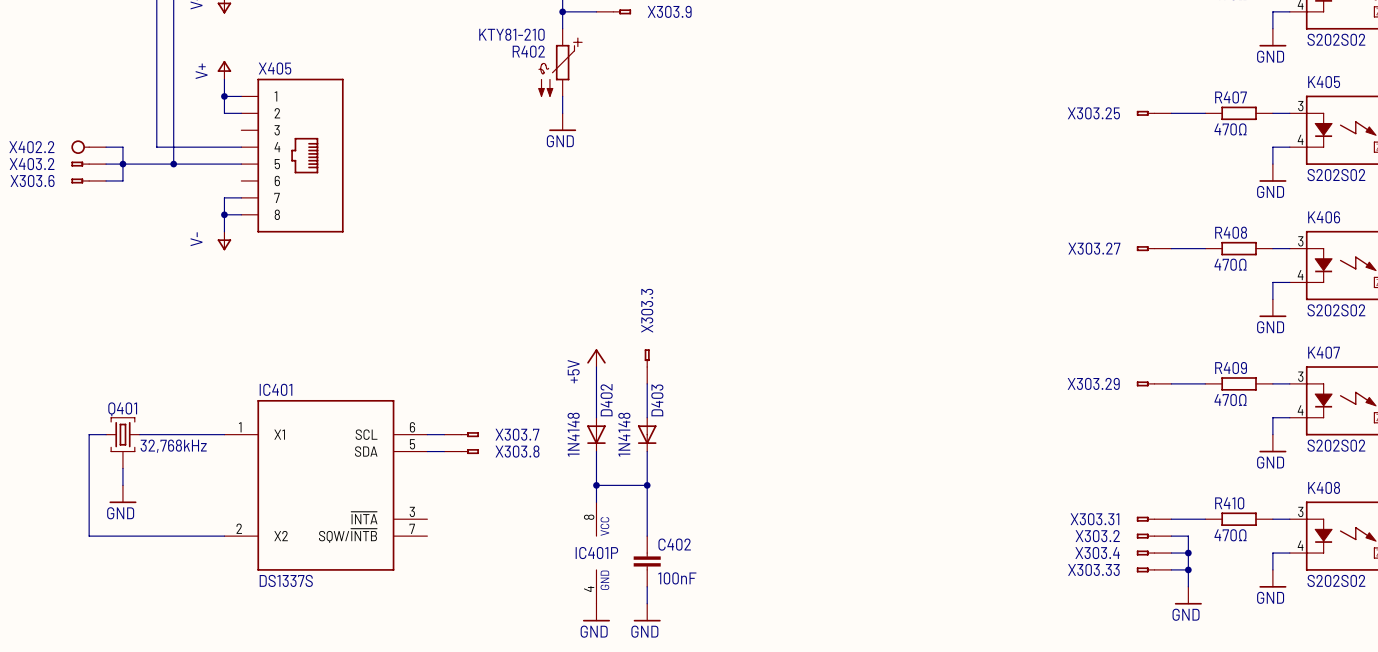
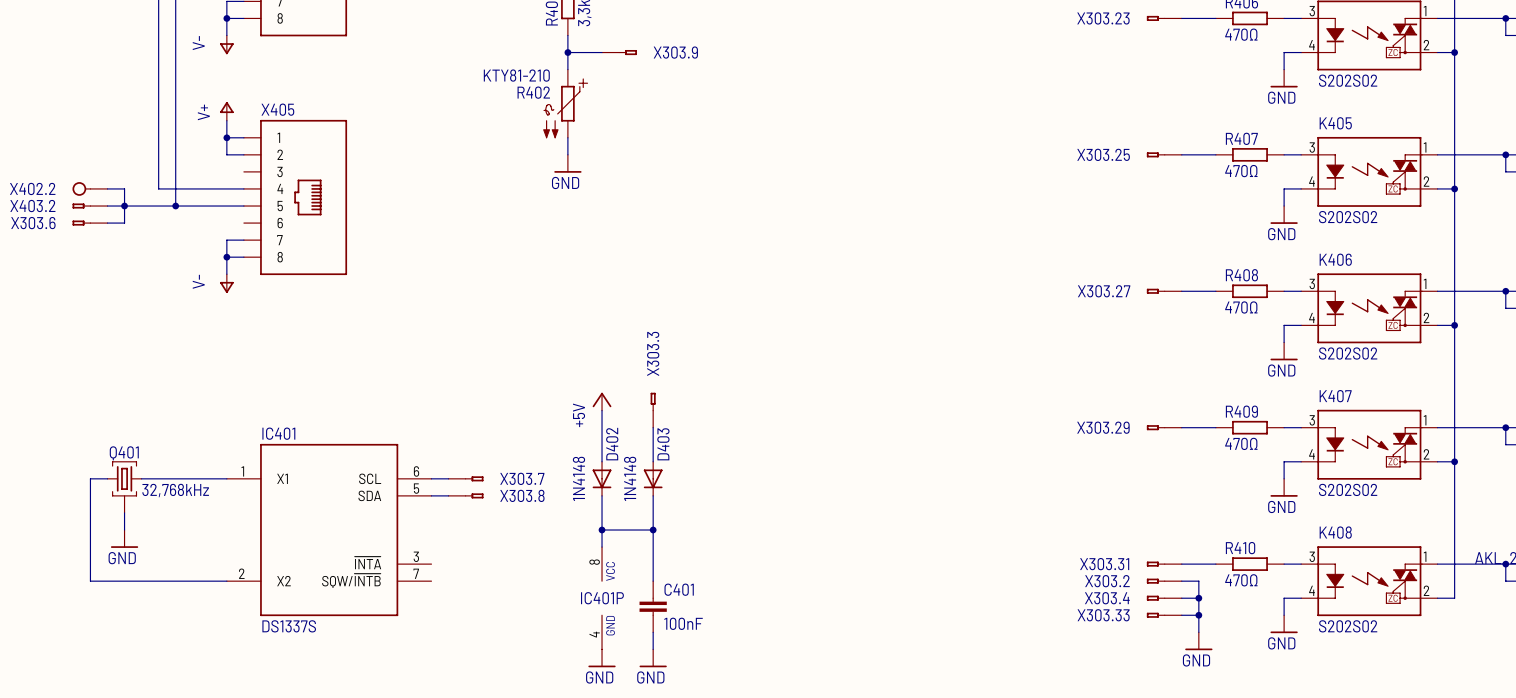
C402 name: C402 (674, 544) -> C401 (679, 589)

